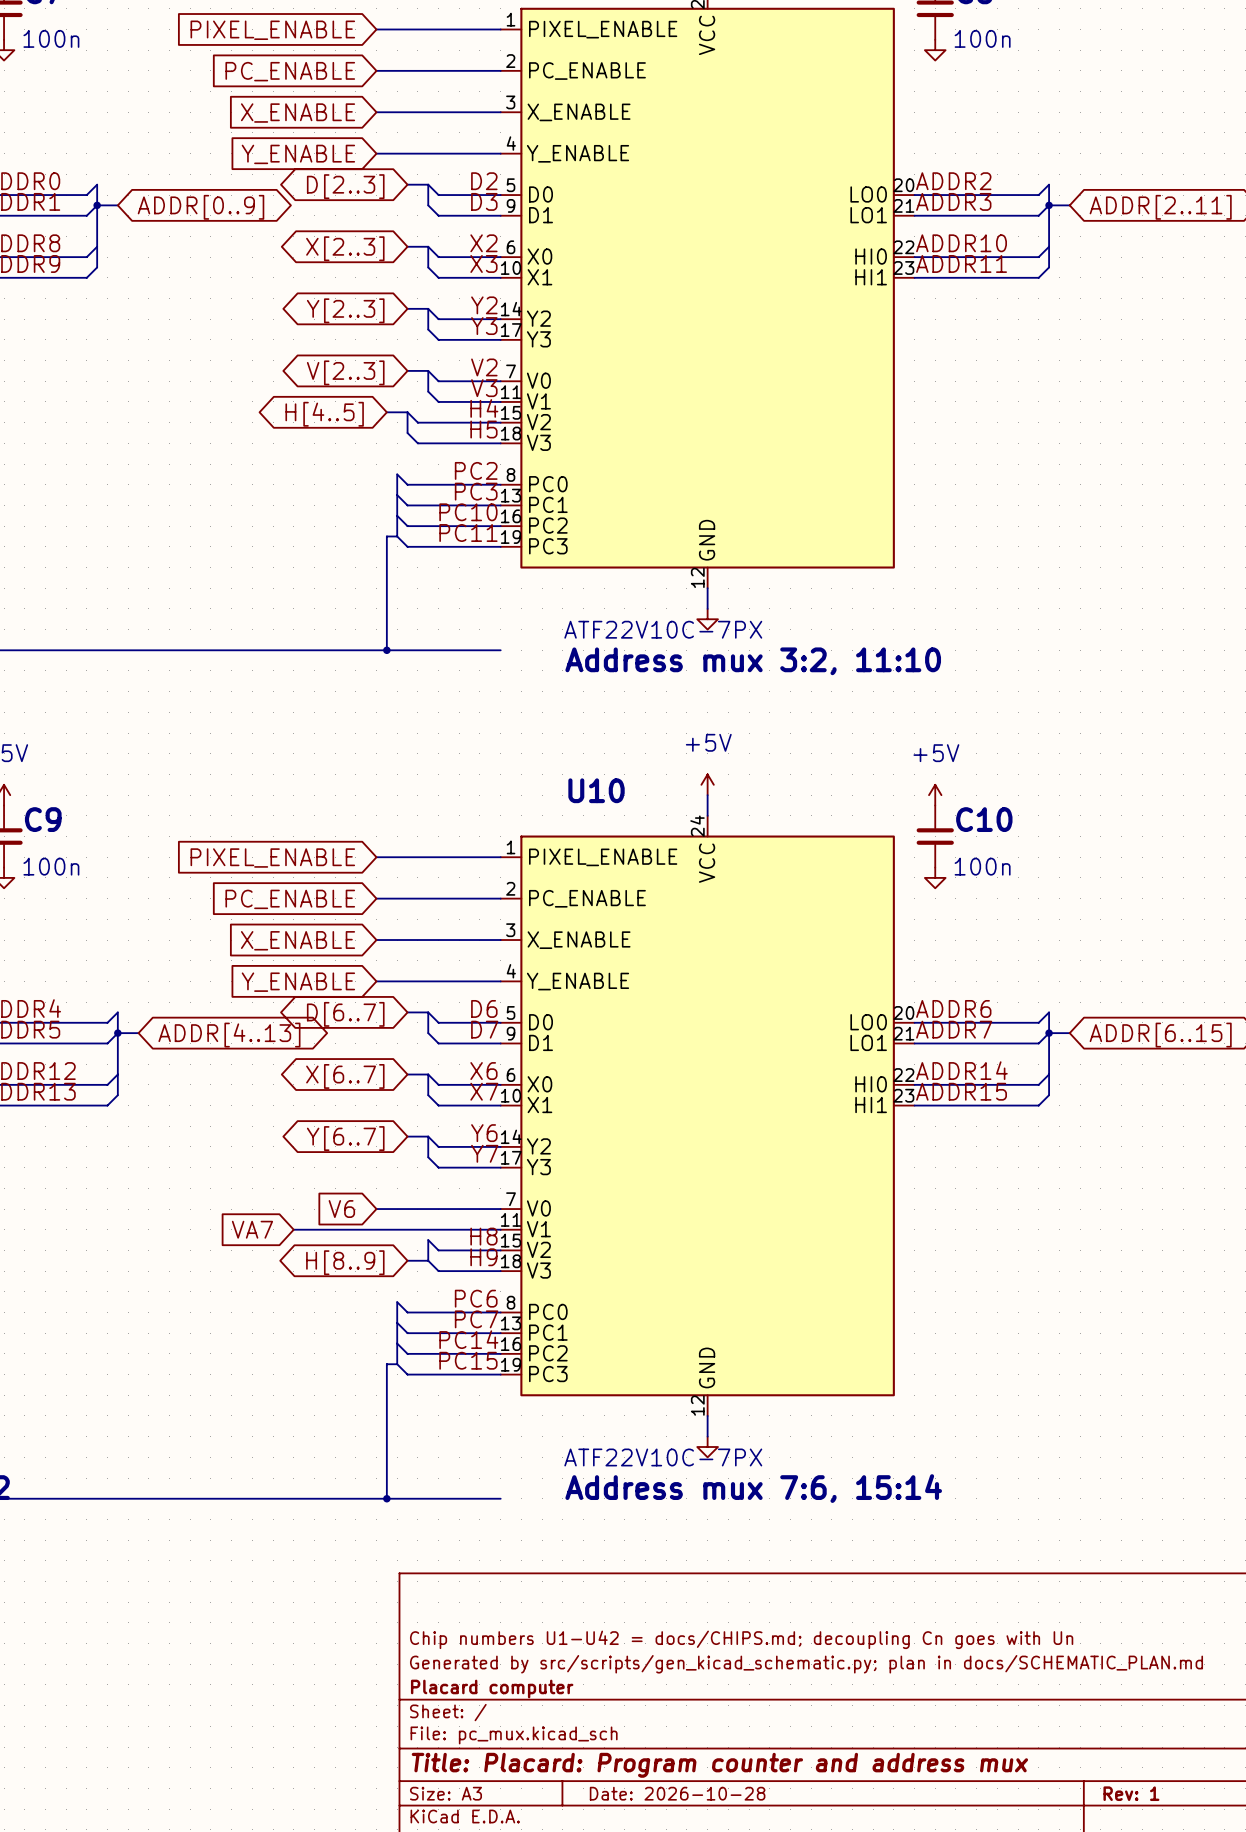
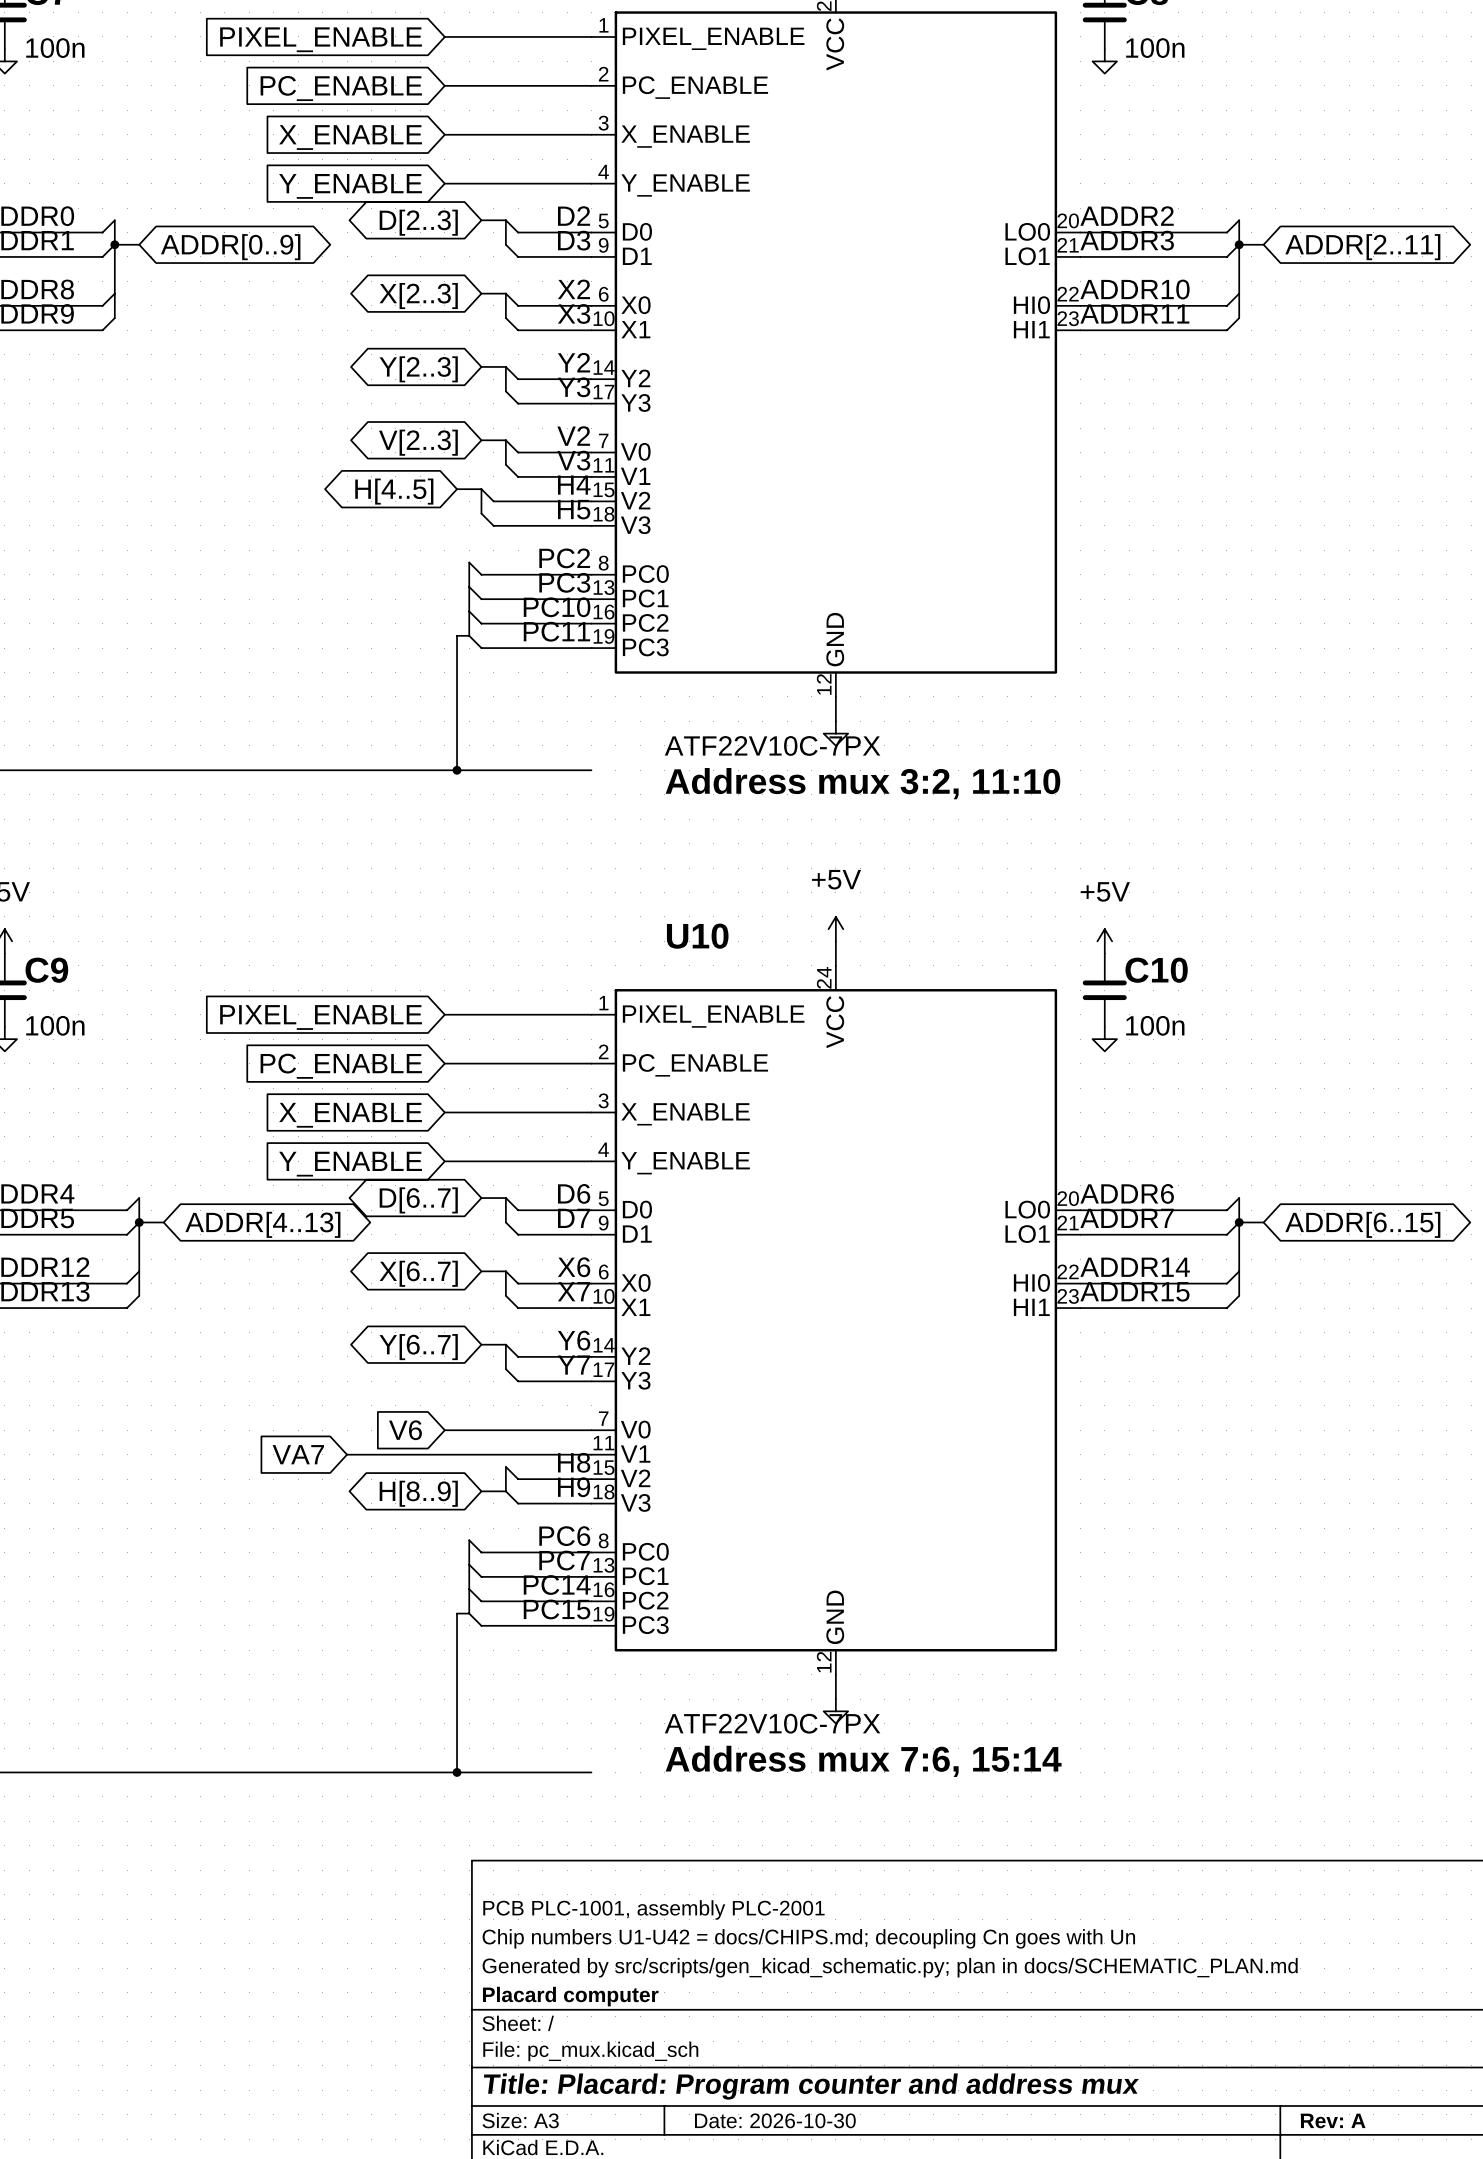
title block: none -> PCB PLC-1001, assembly PLC-2001 (653, 1909)
title block: Date: 2026-10-28 (677, 1793) -> Date: 2026-10-30 (775, 2120)
title block: Rev: 1 (1131, 1793) -> Rev: A (1333, 2120)

